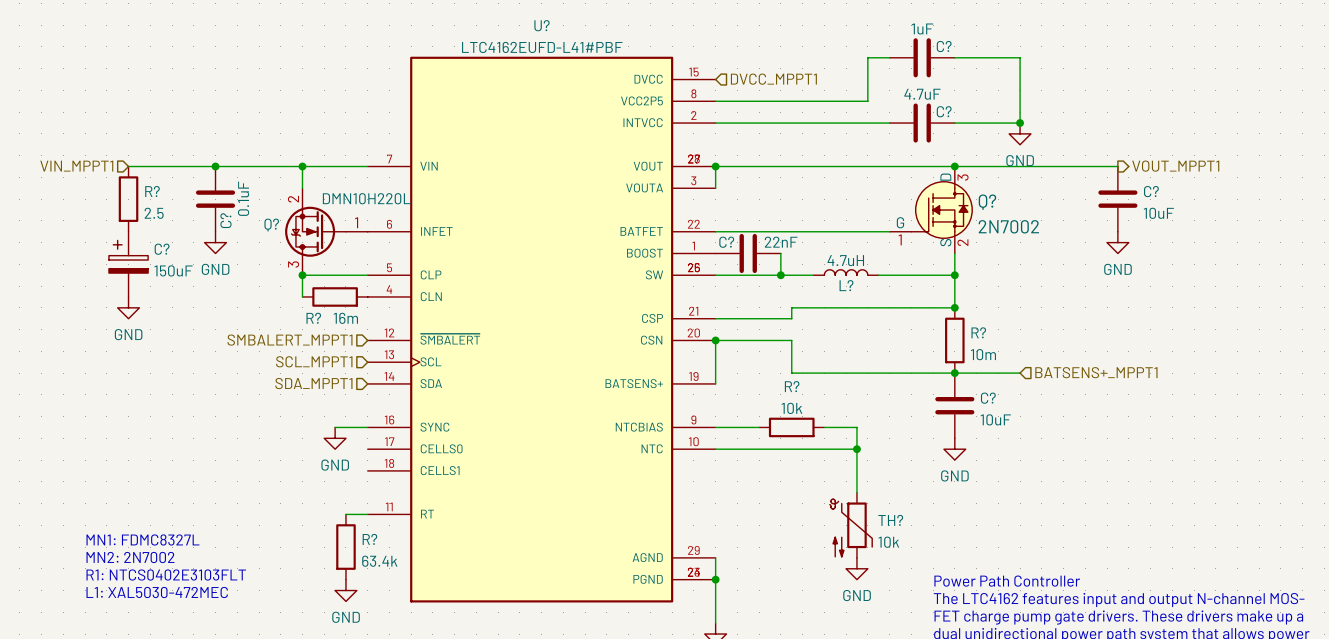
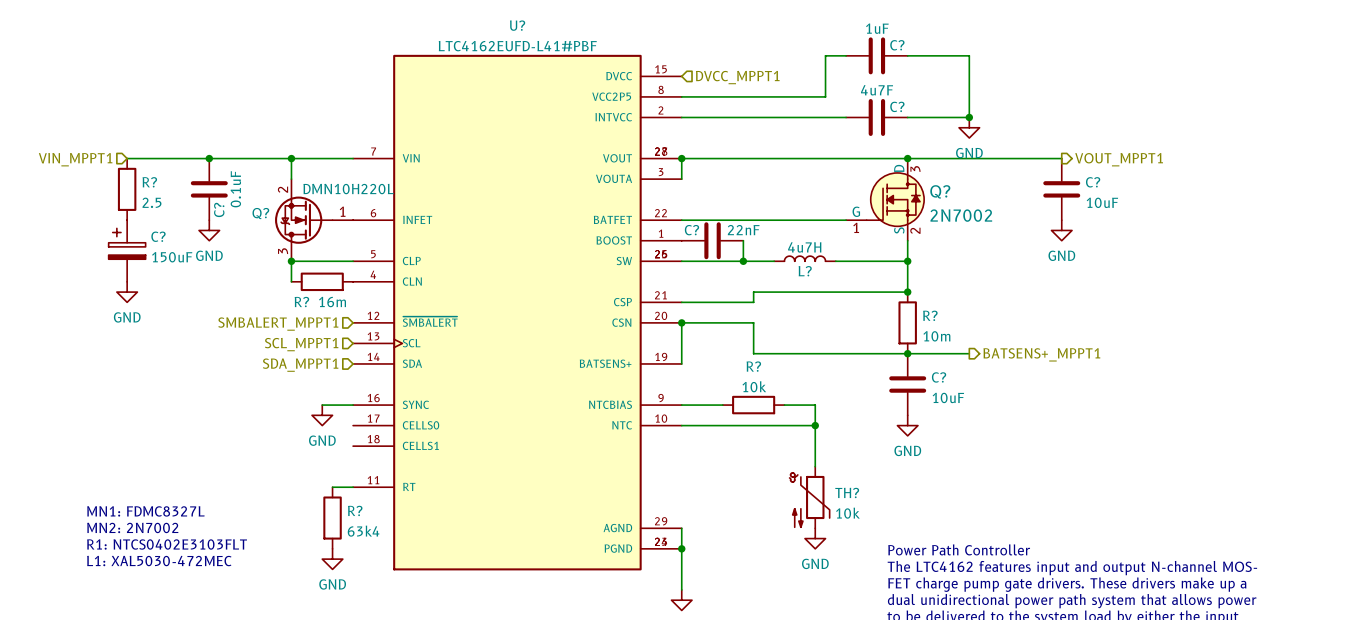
C? value: 4.7uF (922, 94) -> 4u7F (877, 90)
L? value: 4.7uH (845, 260) -> 4u7H (804, 247)
hierarchical label shape: input (1096, 372) -> output (1041, 354)
R? value: 63.4k (379, 561) -> 63k4 (363, 531)

